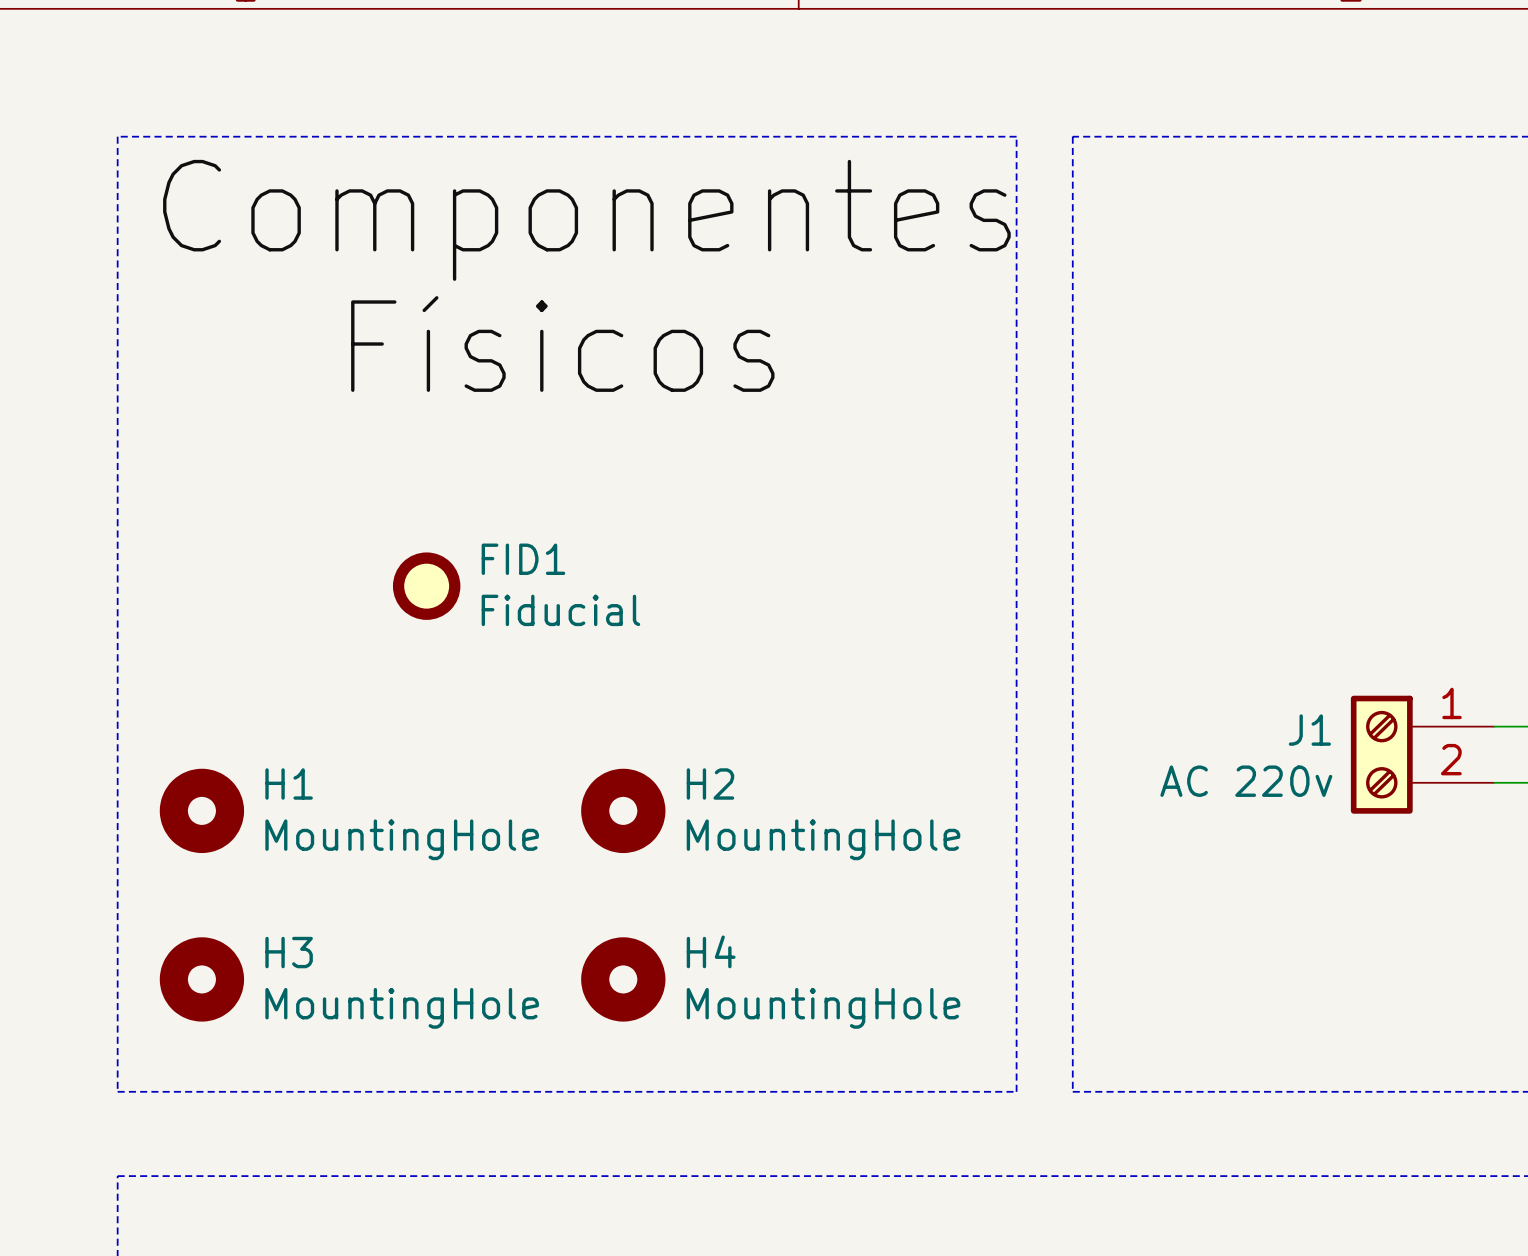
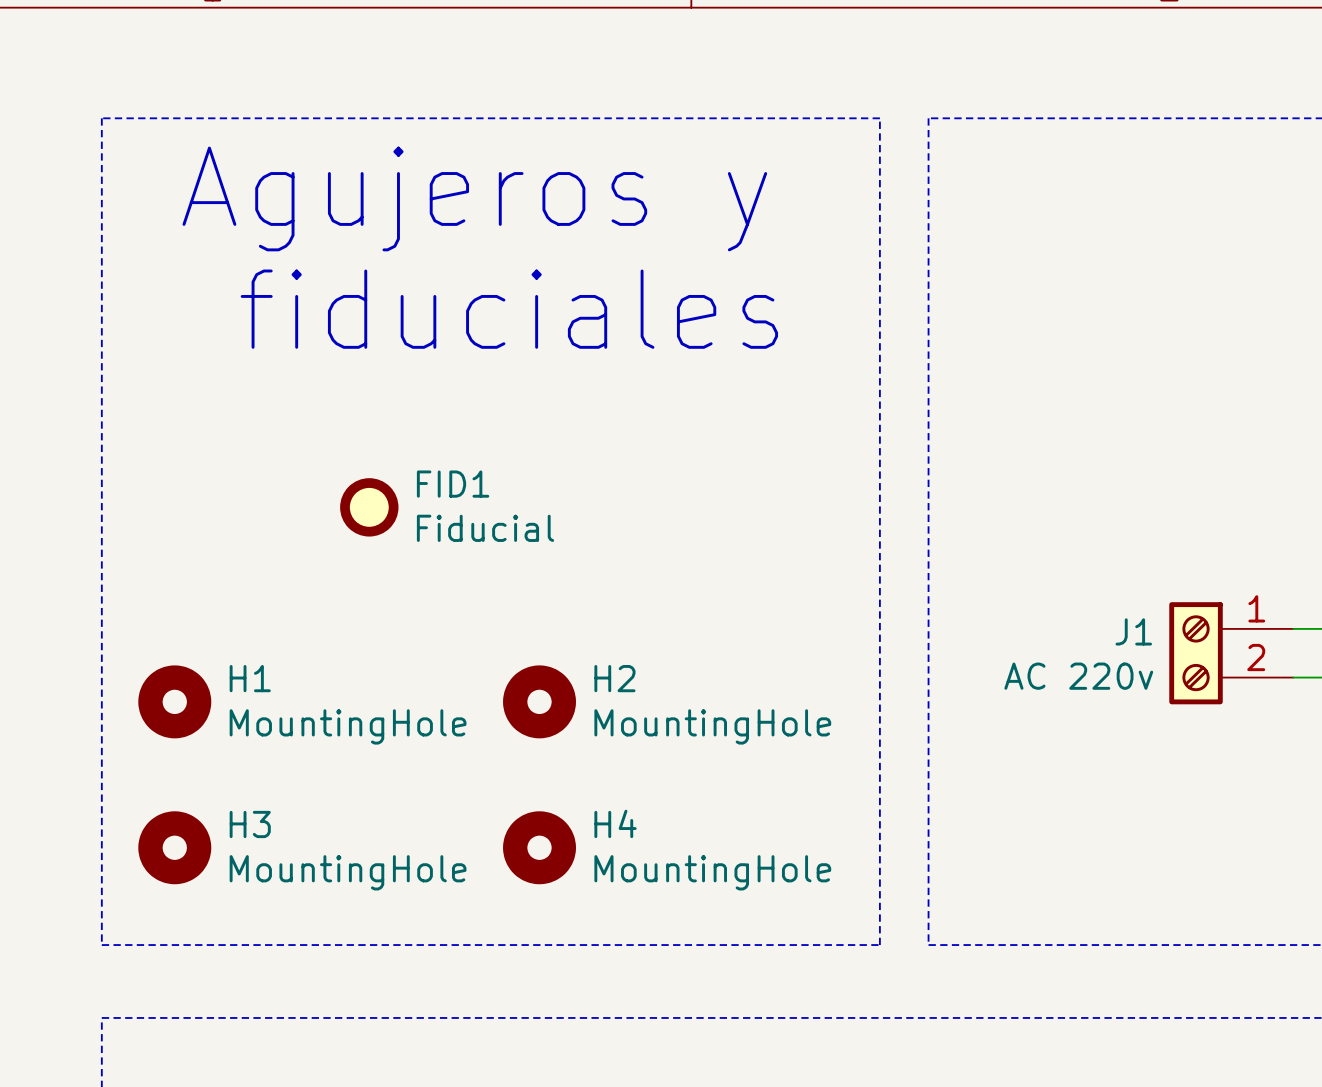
label: Componentes (586, 220) -> none
text: none -> Agujeros y (474, 198)
label: Físicos (562, 344) -> none
text: none -> fiduciales (509, 309)

